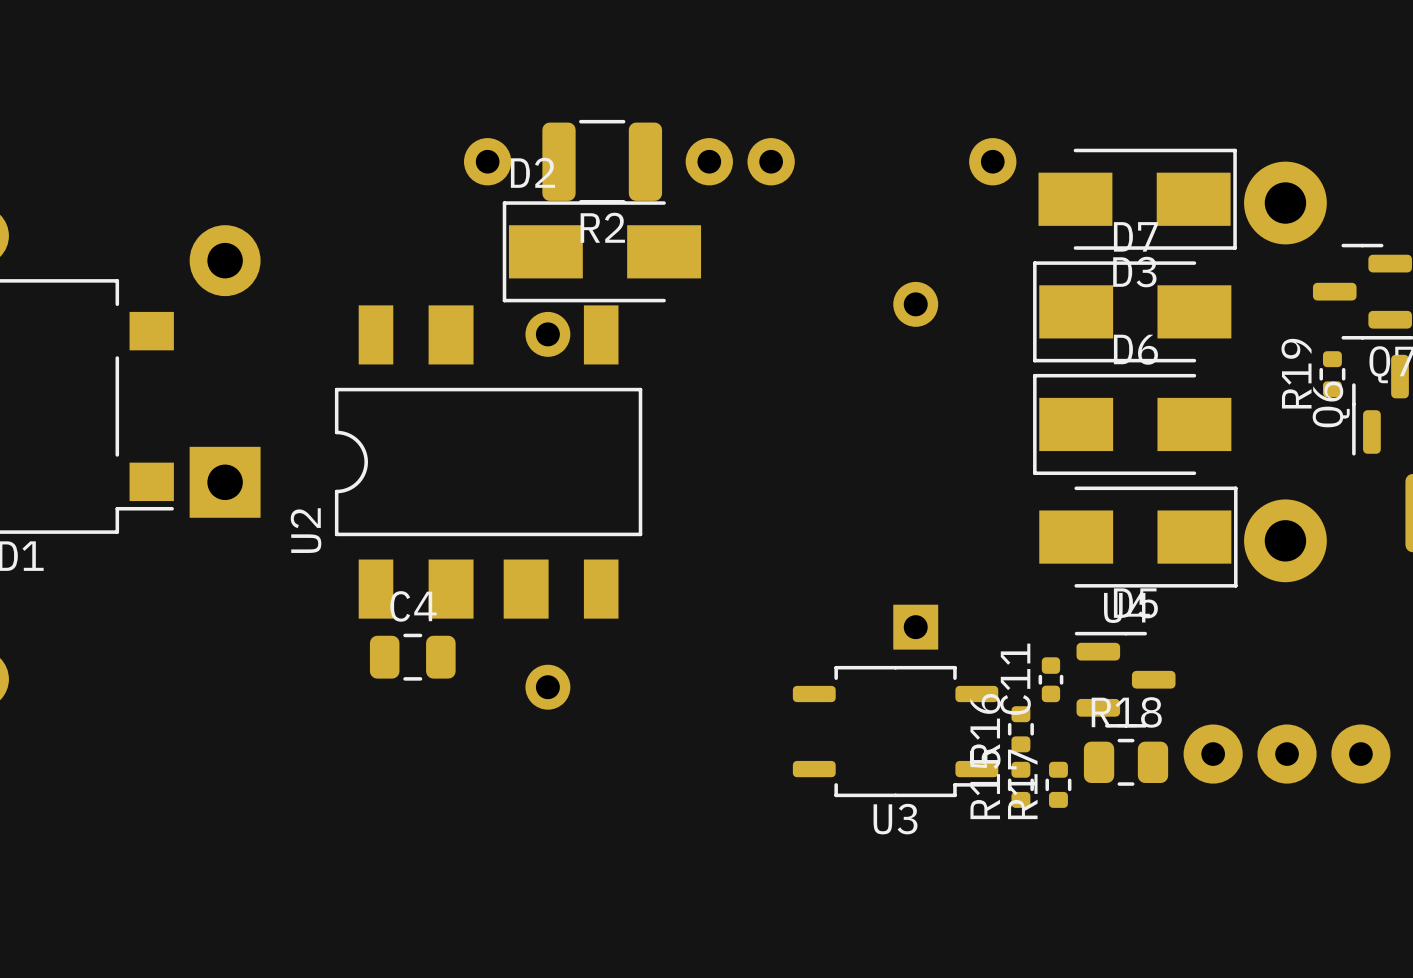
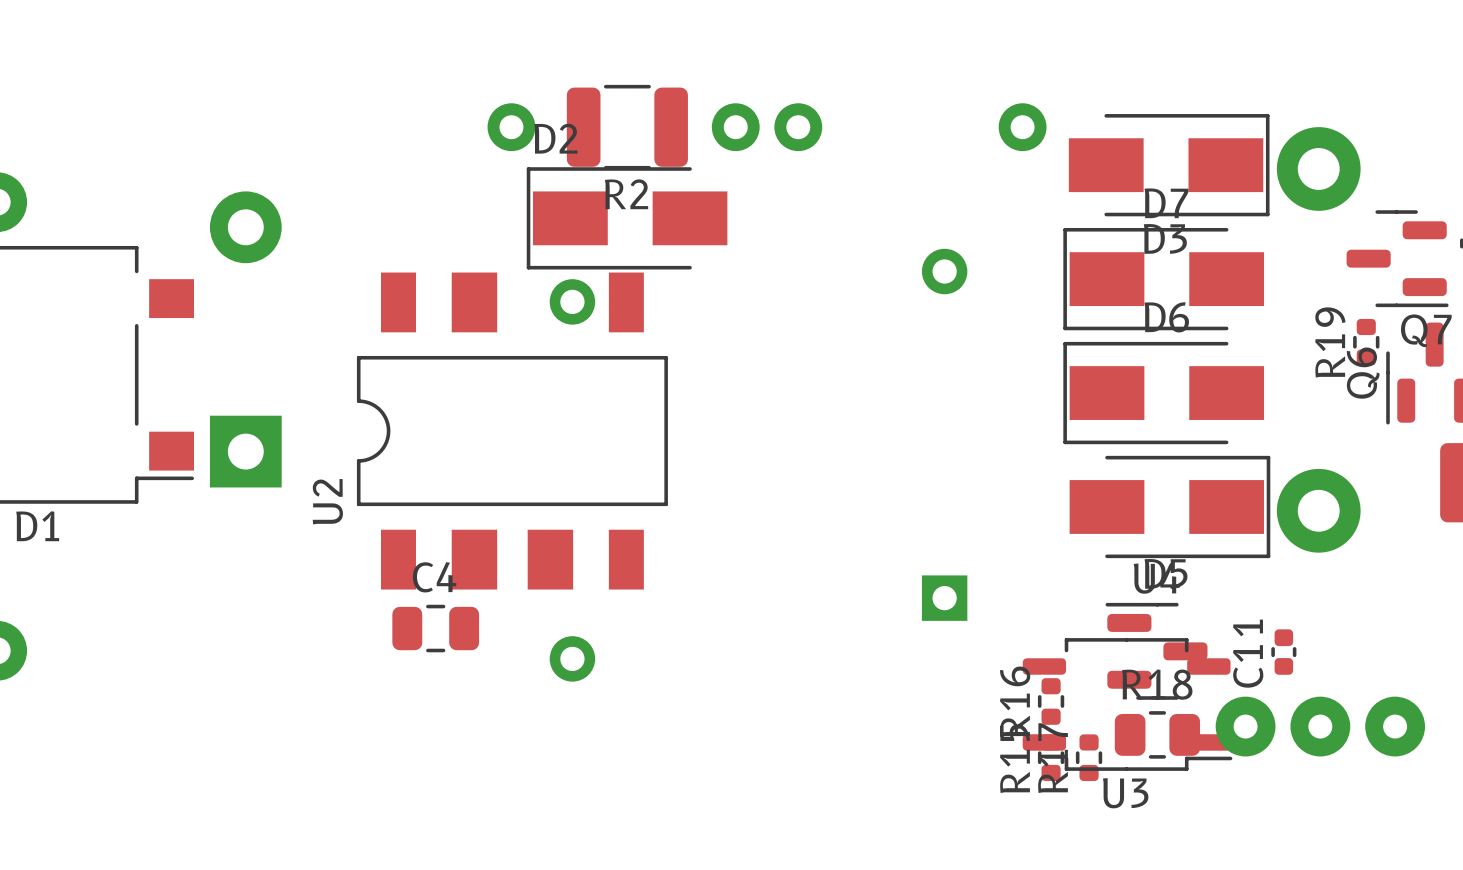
C11 position: (1050, 679) -> (1283, 652)
U3 position: (896, 731) -> (1127, 704)

